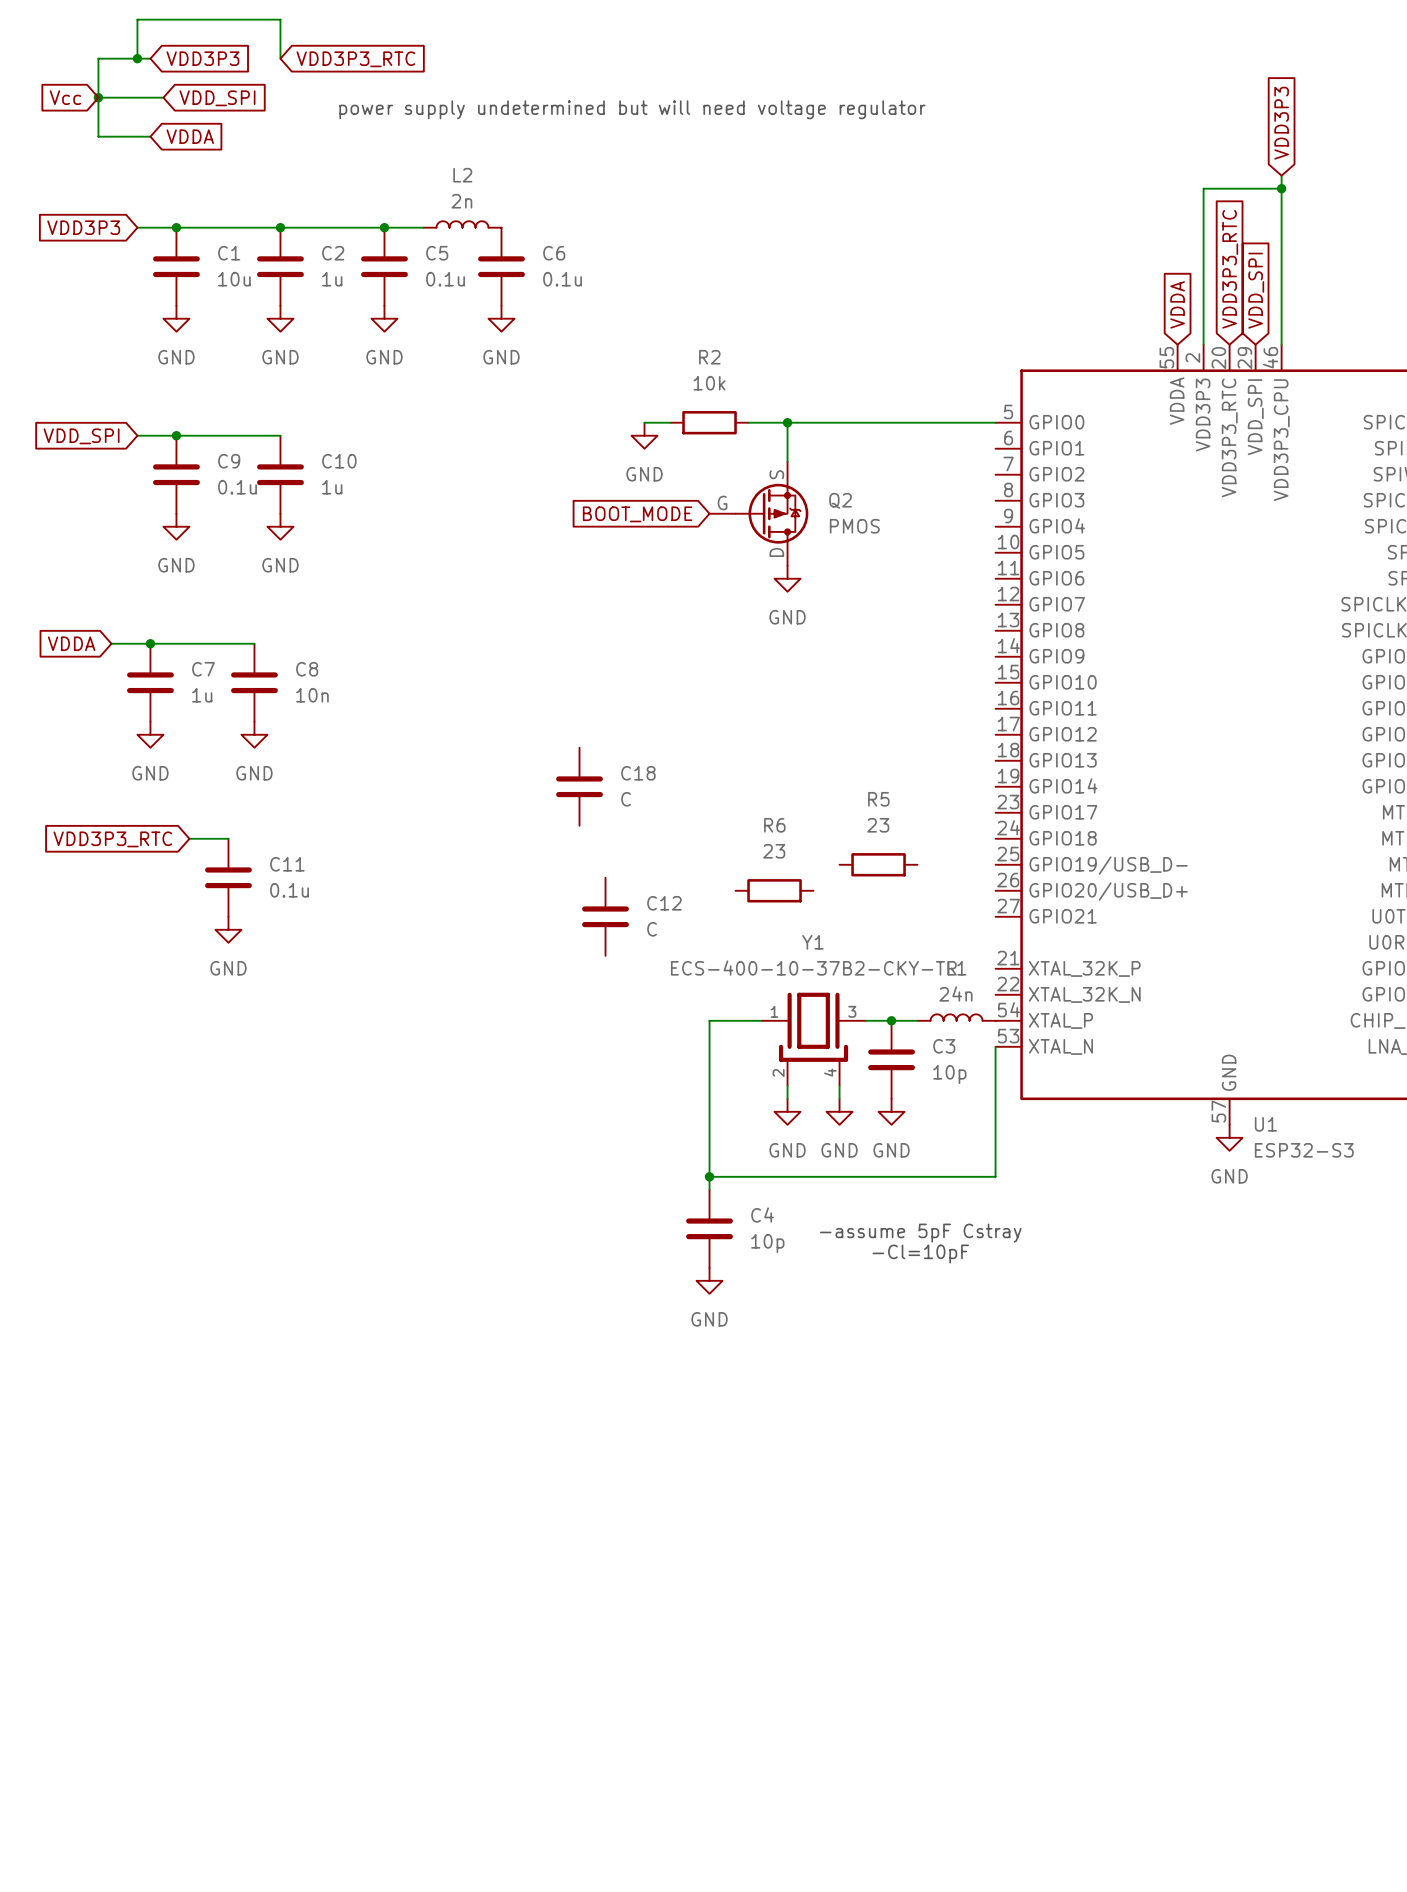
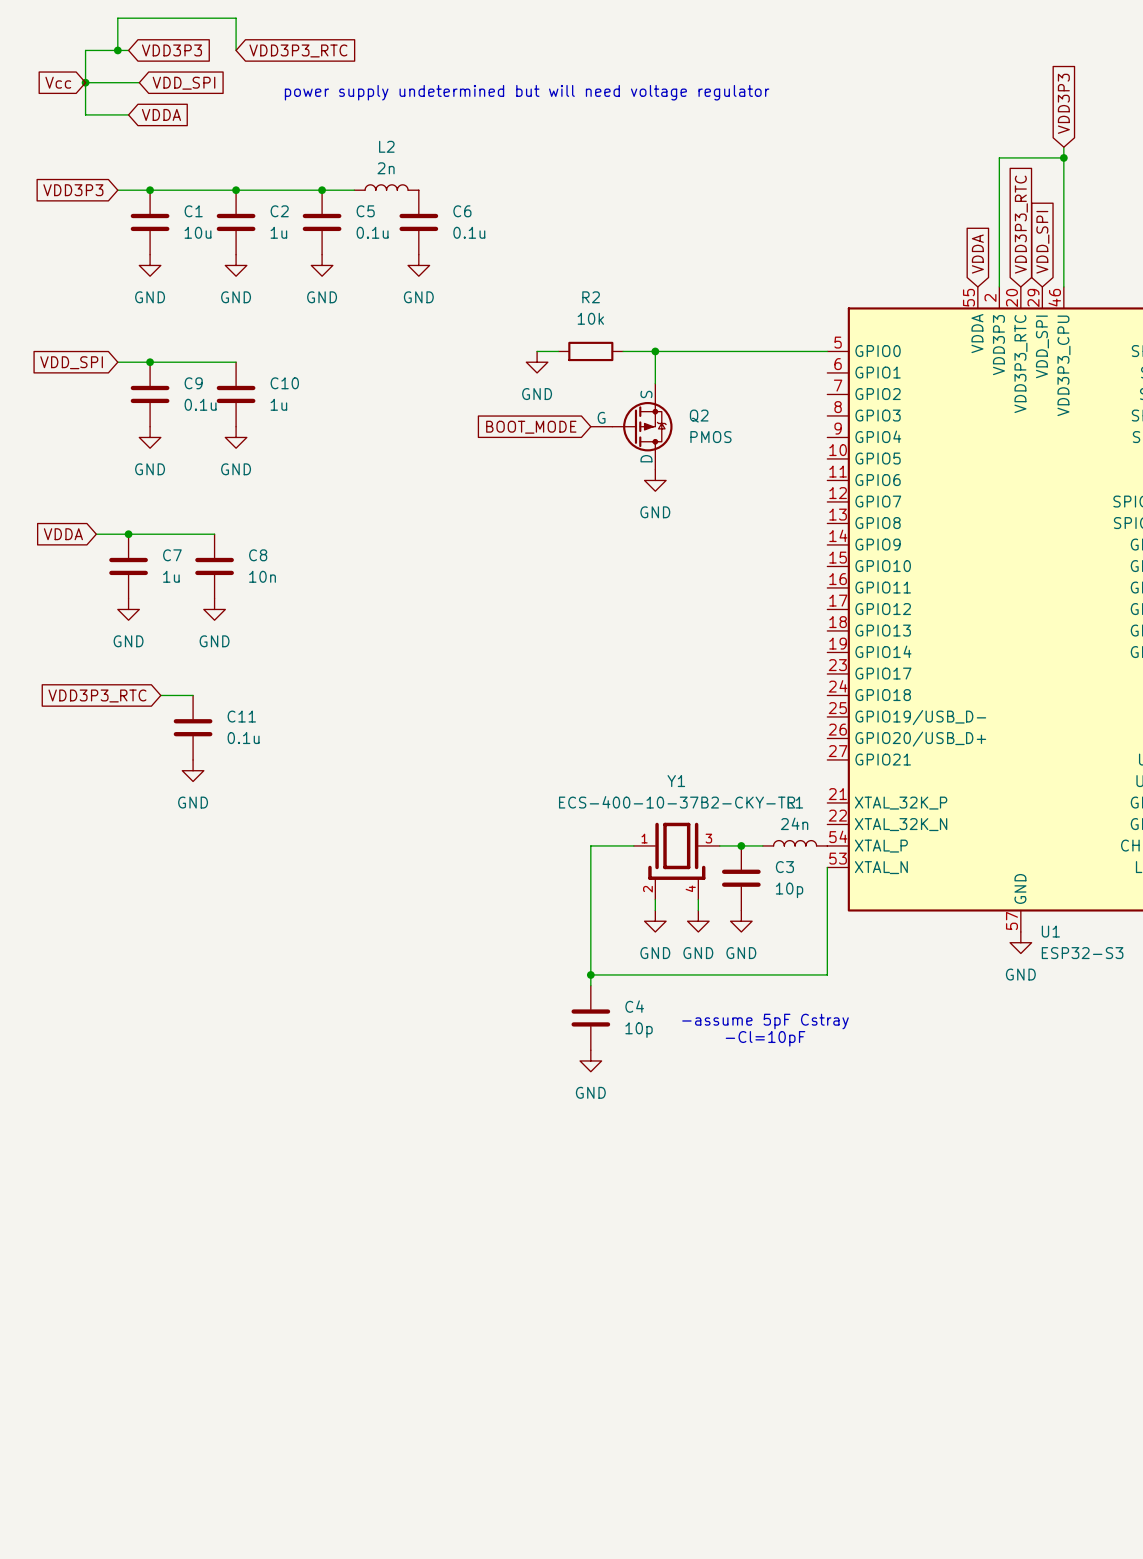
C18: C (579, 786) -> none
R5: 23 (878, 864) -> none
R6: 23 (774, 890) -> none
C12: C (605, 916) -> none

